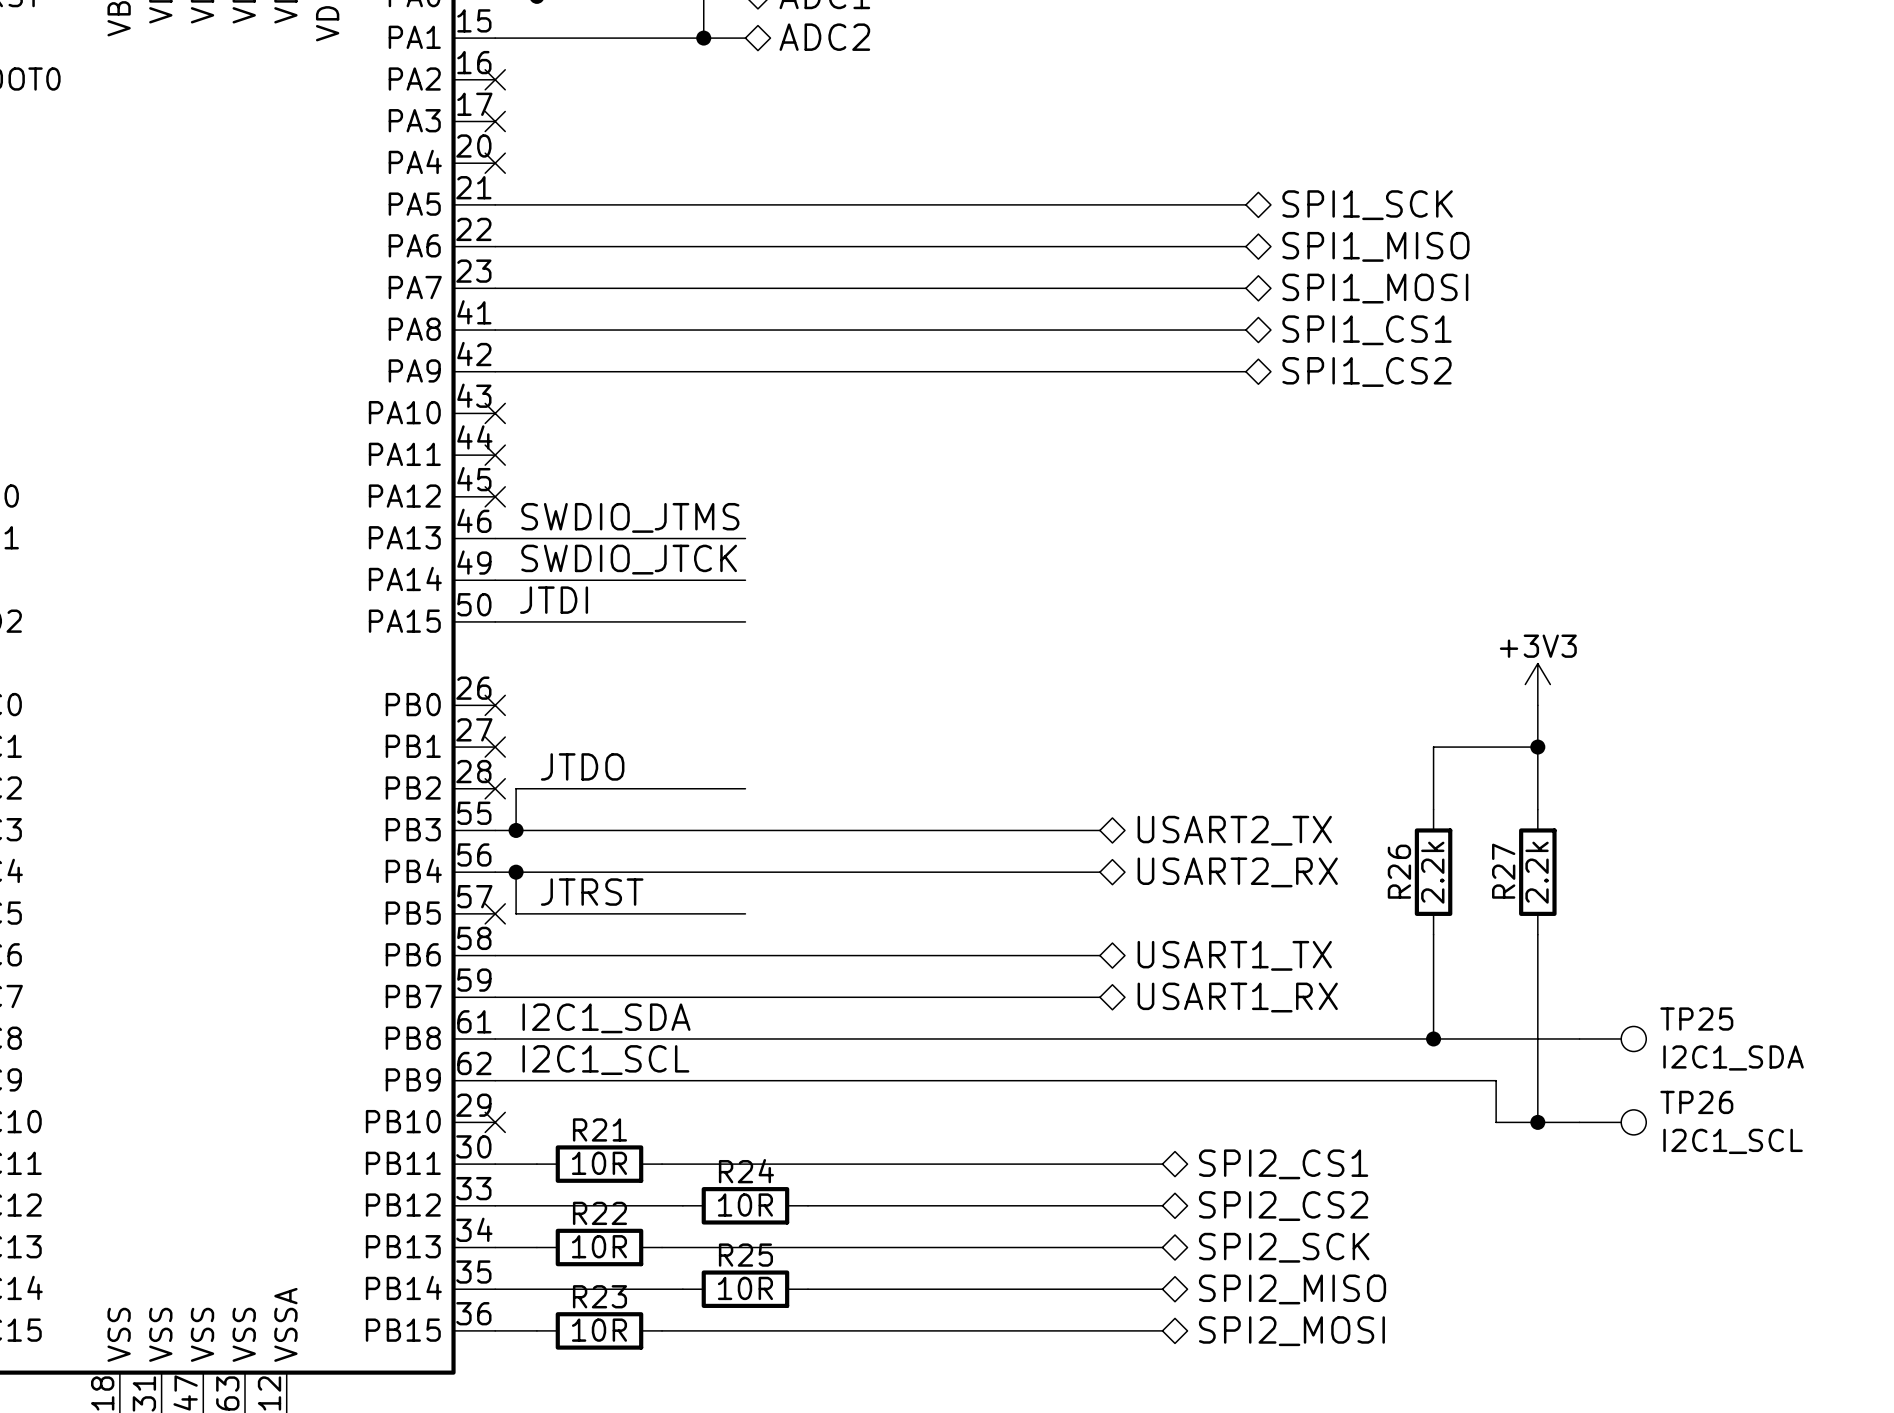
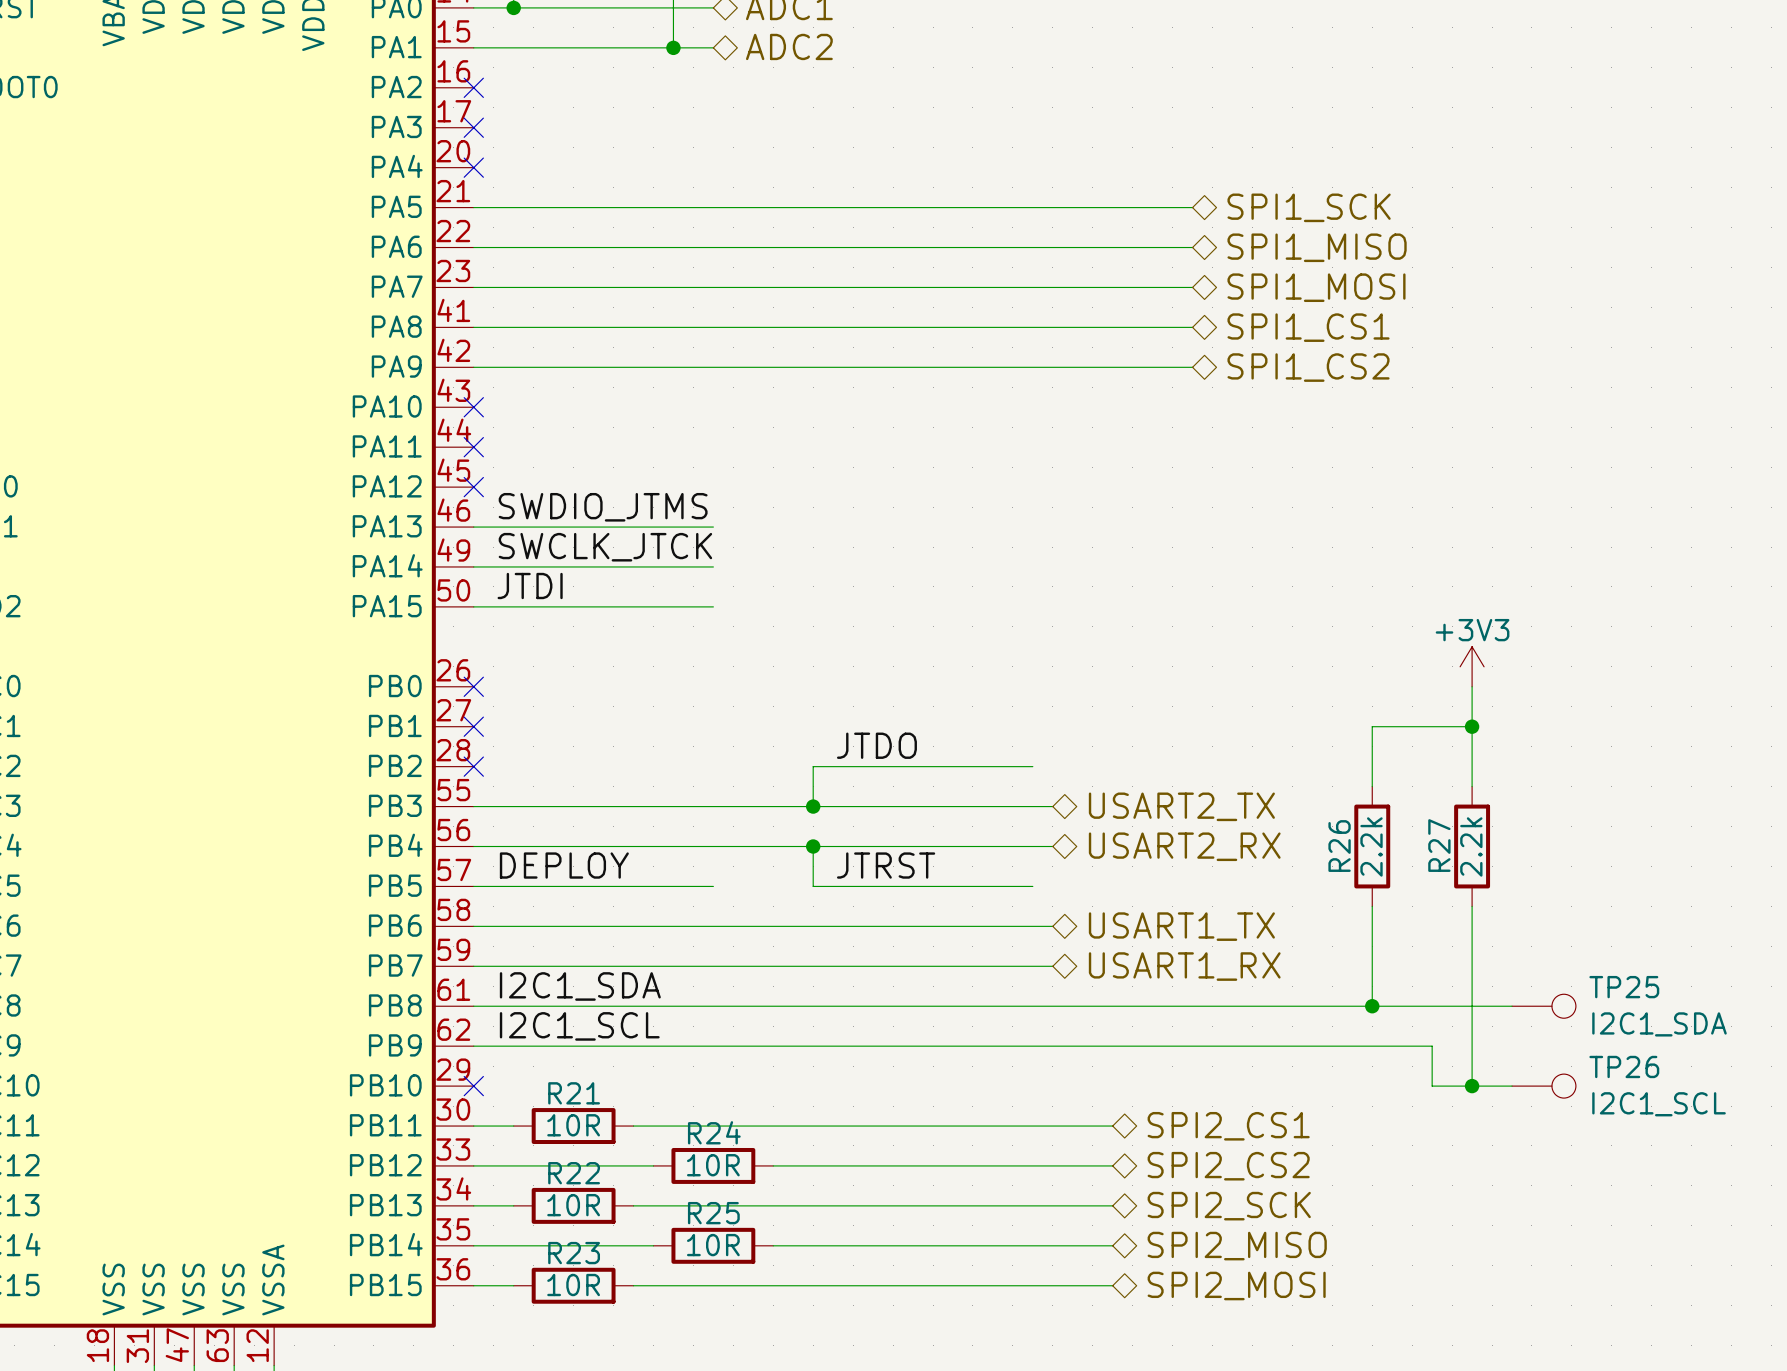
label: SWDIO_JTCK (629, 559) -> SWCLK_JTCK (605, 547)
label position: JTDO (582, 766) -> JTDO (876, 745)
wire: (745, 788) (516, 788) (516, 830) -> (1032, 766) (813, 766) (813, 806)
junction: (516, 830) -> none
junction: none -> (813, 806)
wire: (516, 872) (516, 913) -> (473, 886) (493, 886)
junction: (516, 872) -> none
wire: none -> (813, 846) (813, 886) (1032, 886)
junction: none -> (813, 846)
label: none -> DEPLOY (564, 865)
label position: JTRST (592, 892) -> JTRST (886, 865)
no-connect mark: (495, 913) -> none

